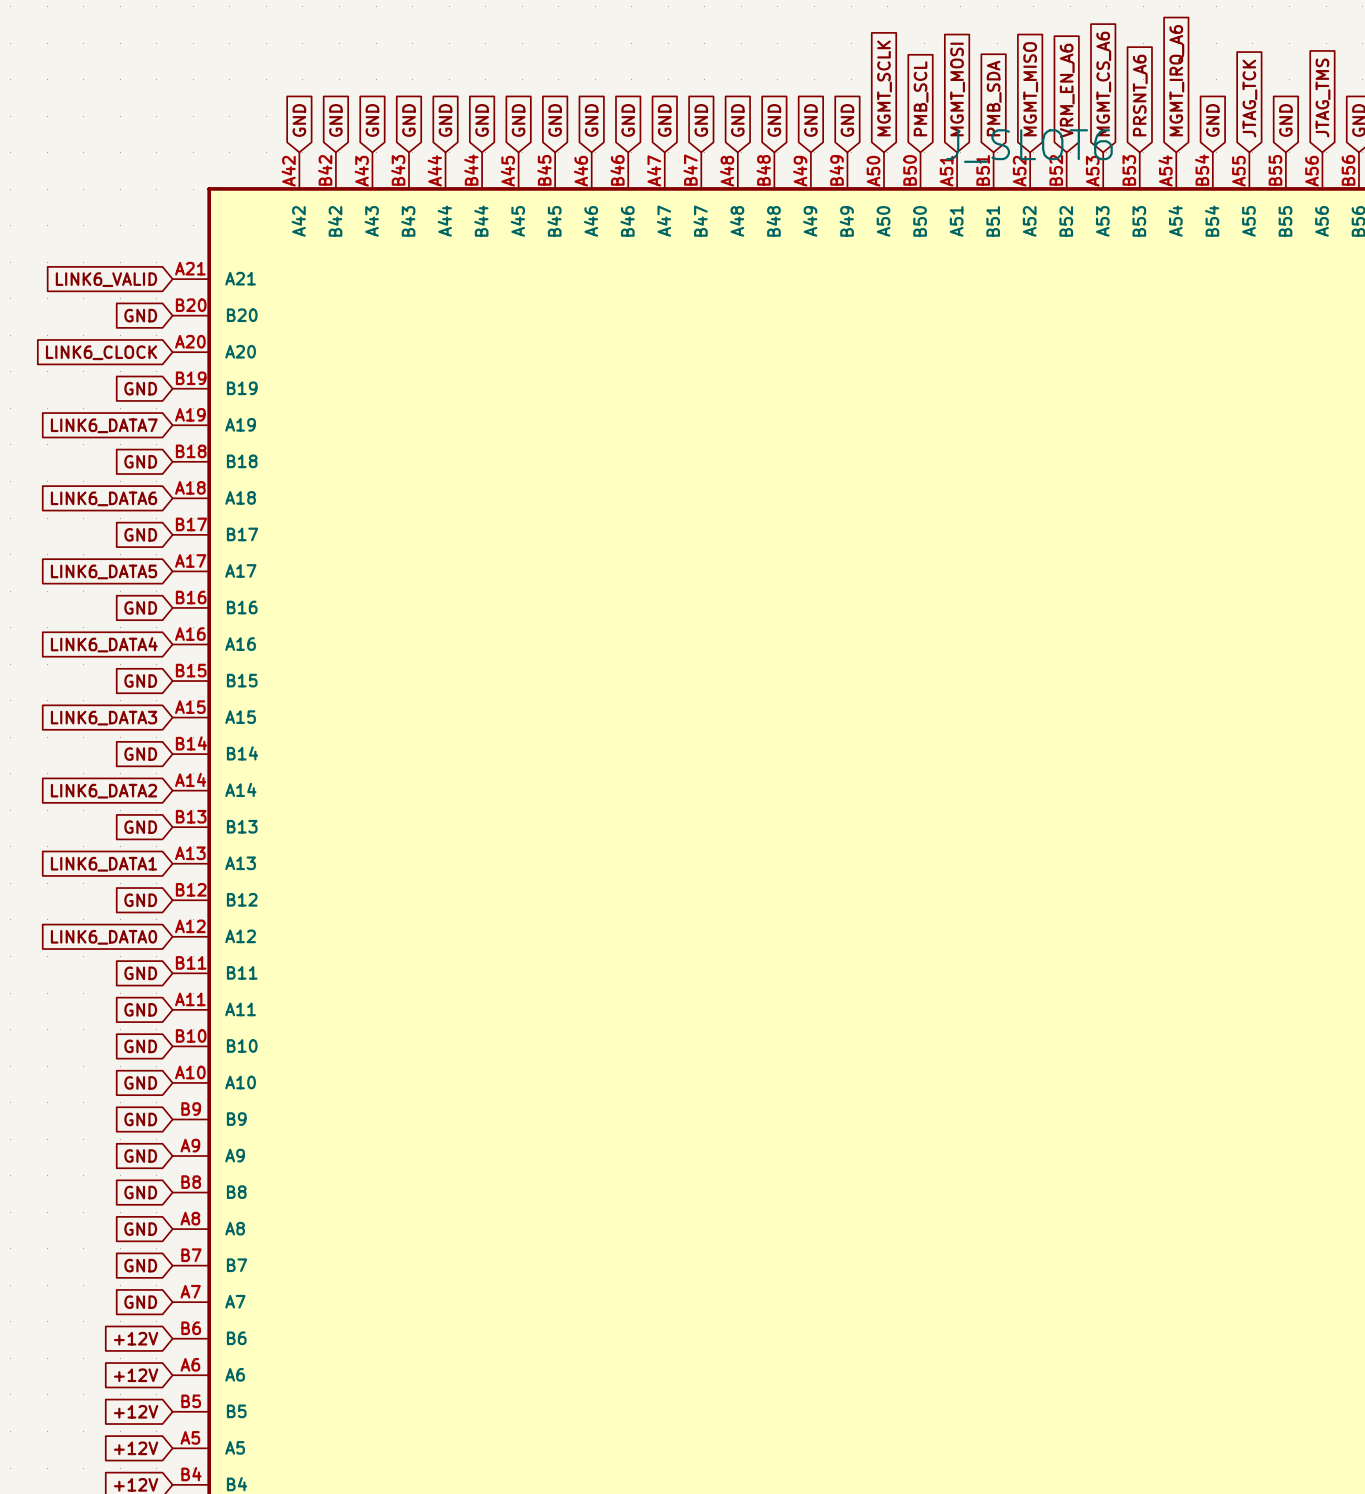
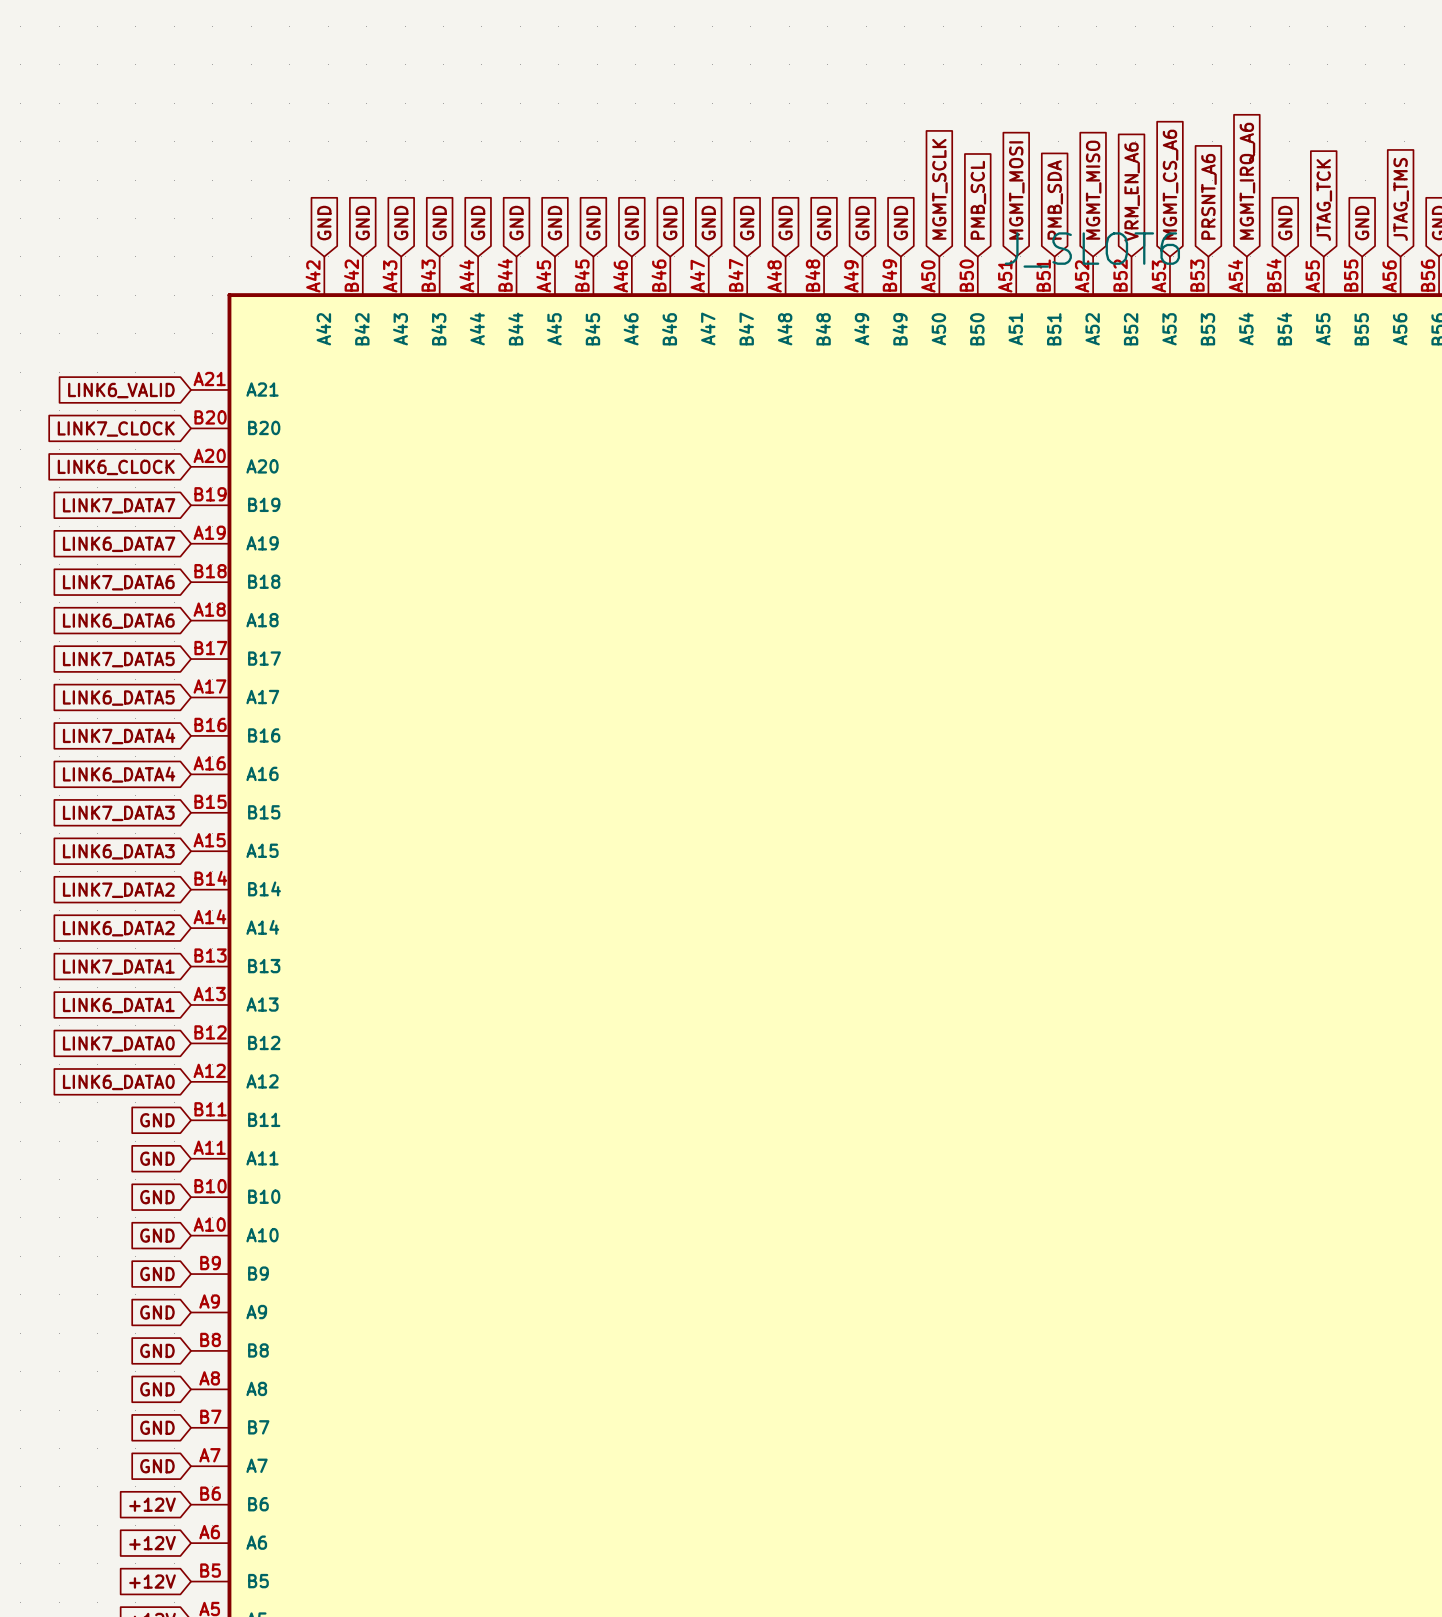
global label: GND (140, 315) -> LINK7_CLOCK (116, 428)
global label: GND (140, 388) -> LINK7_DATA7 (119, 505)
global label: GND (140, 461) -> LINK7_DATA6 (118, 582)
global label: GND (140, 534) -> LINK7_DATA5 (118, 659)
global label: GND (140, 607) -> LINK7_DATA4 (119, 736)
global label: GND (140, 681) -> LINK7_DATA3 (118, 813)
global label: GND (140, 754) -> LINK7_DATA2 (118, 890)
global label: GND (140, 827) -> LINK7_DATA1 (118, 967)
global label: GND (140, 900) -> LINK7_DATA0 (118, 1043)

